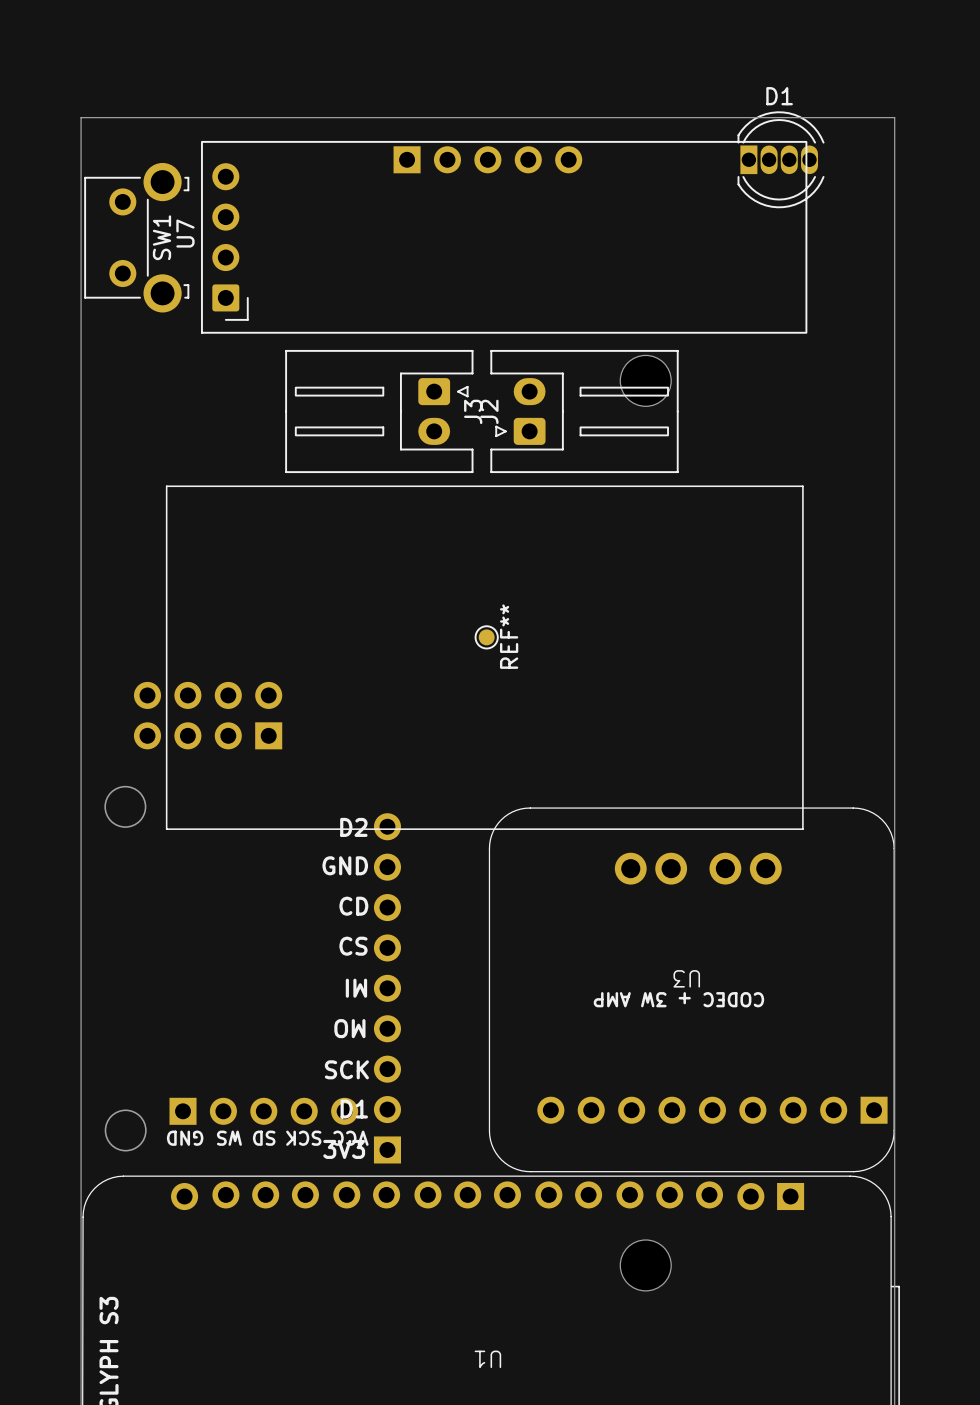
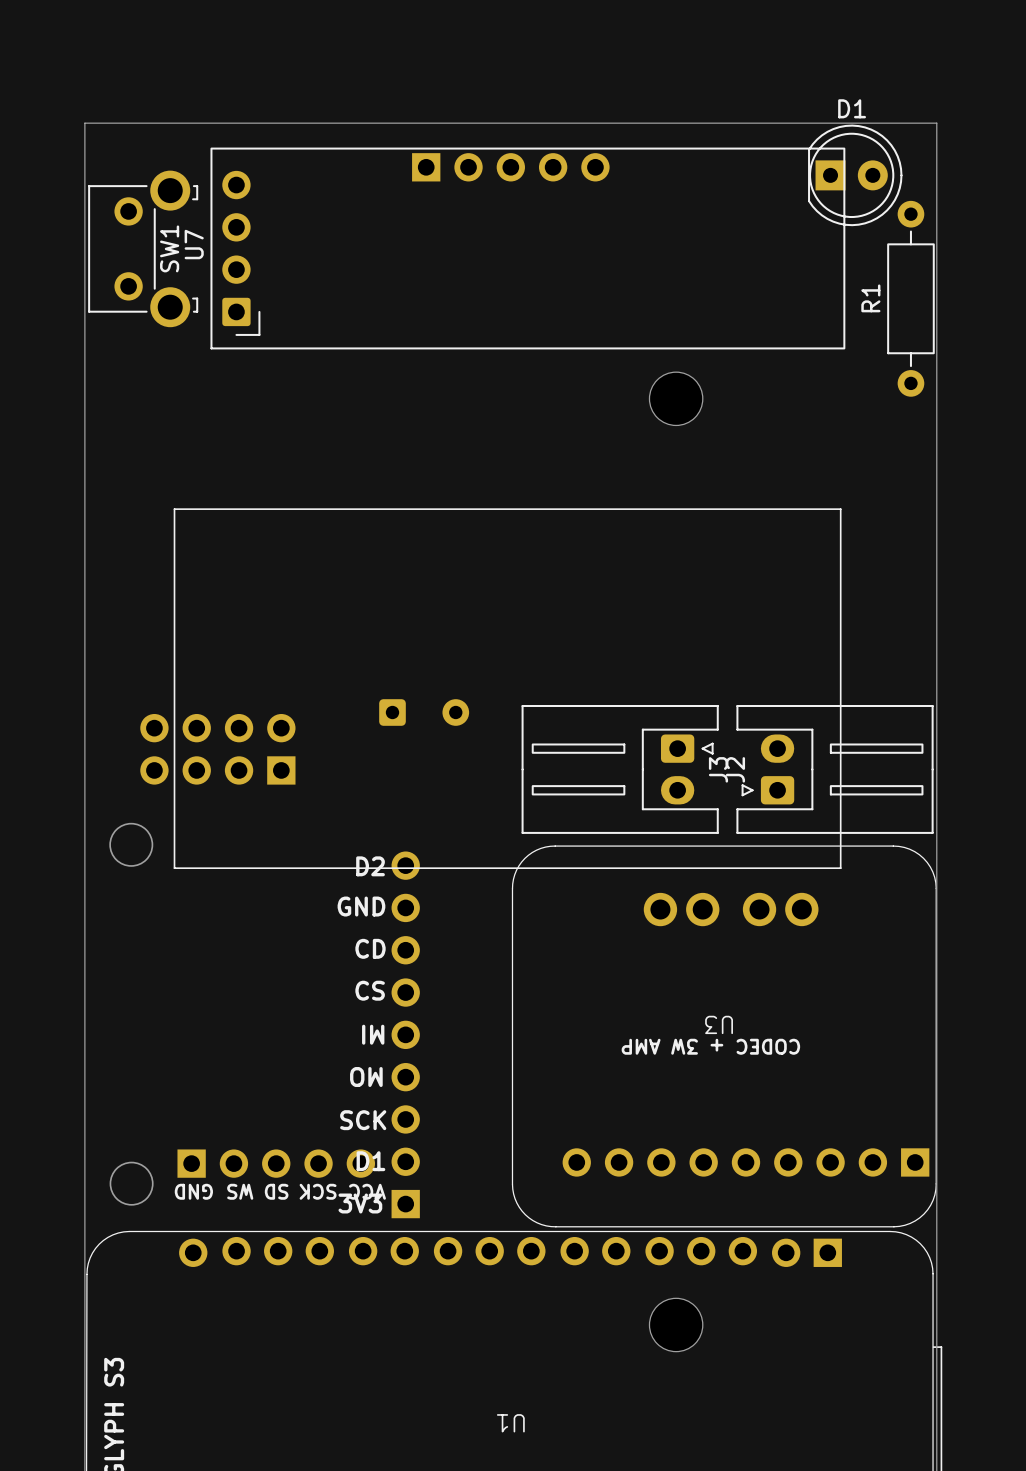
D1 footprint: [737, 111, 825, 209] -> [808, 124, 903, 227]
R1: none -> (910, 298)
J2 position: (379, 411) -> (620, 769)
J3 position: (584, 411) -> (835, 769)
REF**: (486, 637) -> none
part: none -> (424, 712)

